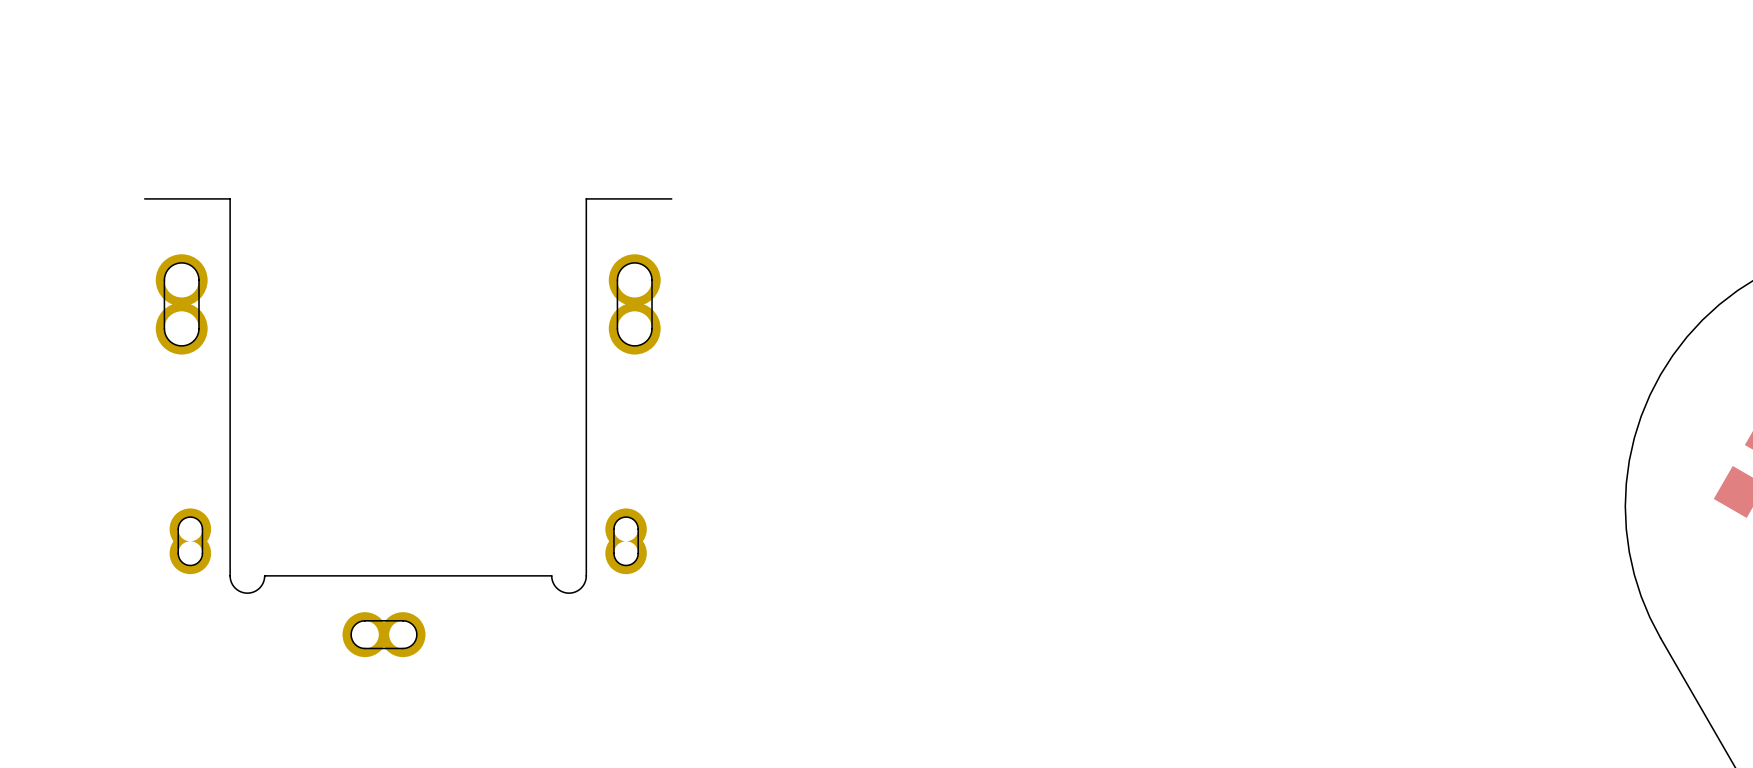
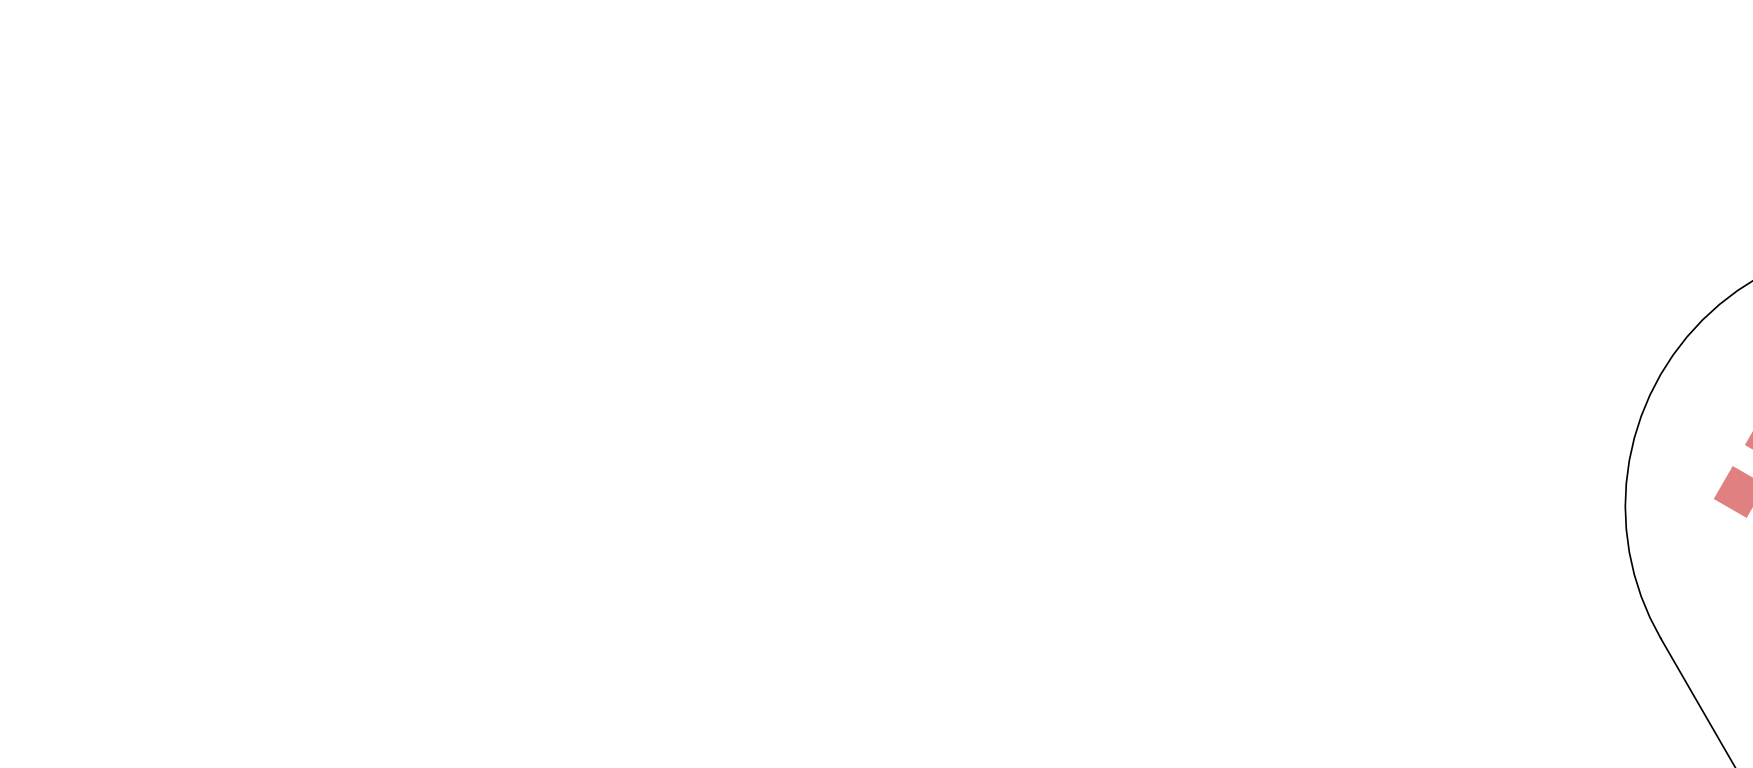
part: (408, 428) -> none

